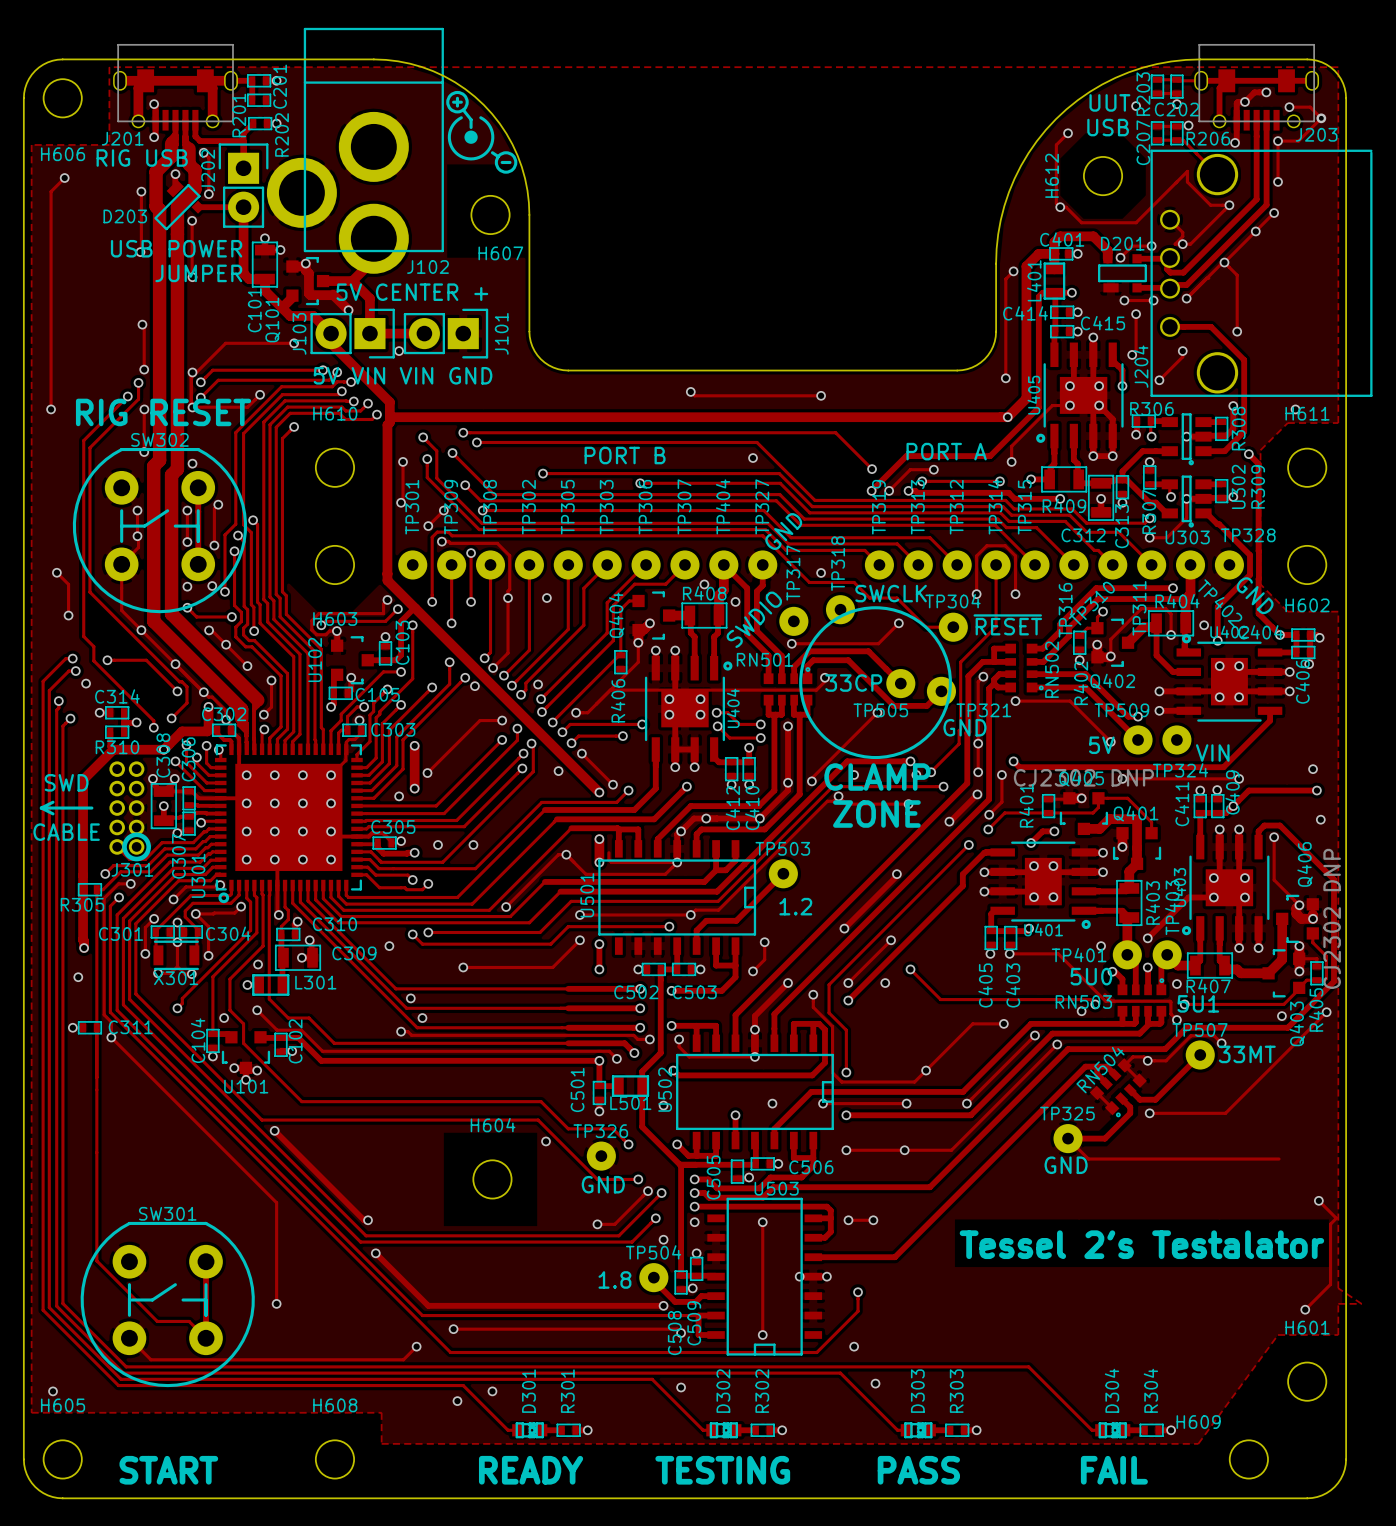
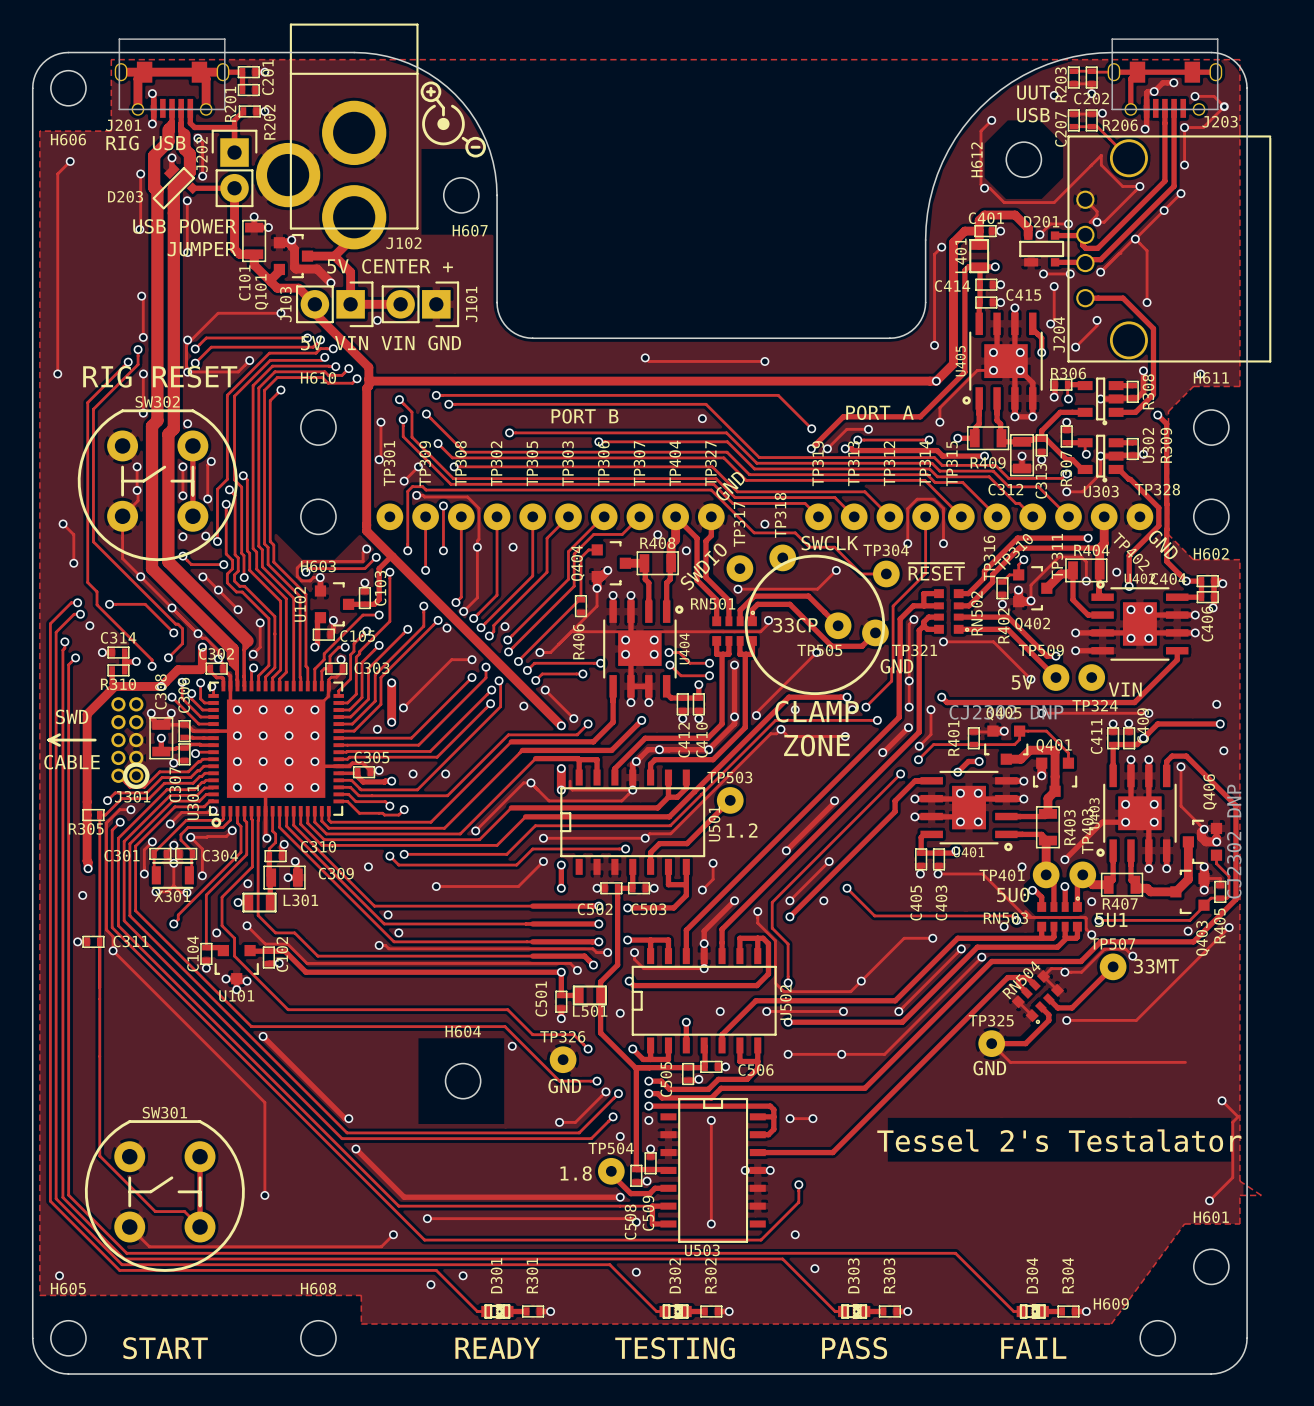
U501 rotation: 0° (677, 897) -> 180° (632, 822)
U502 rotation: 0° (754, 1091) -> 180° (704, 1000)
U503 rotation: 0° (764, 1276) -> 180° (713, 1170)

